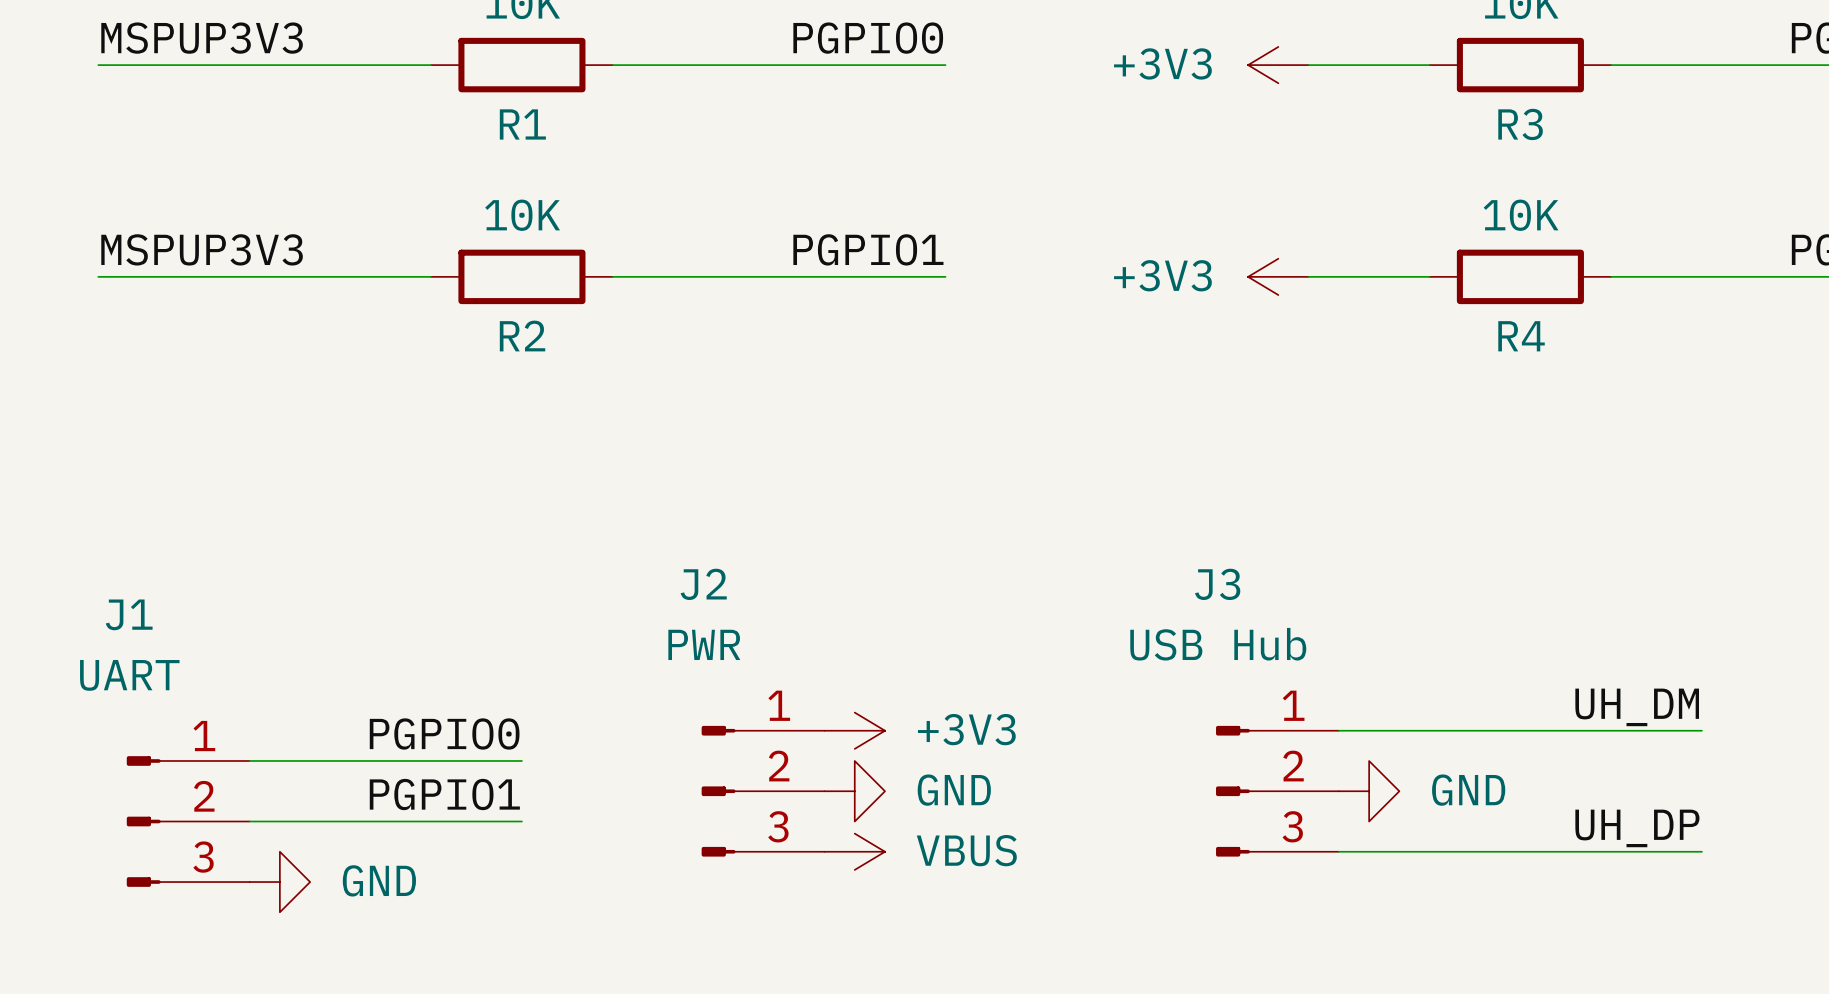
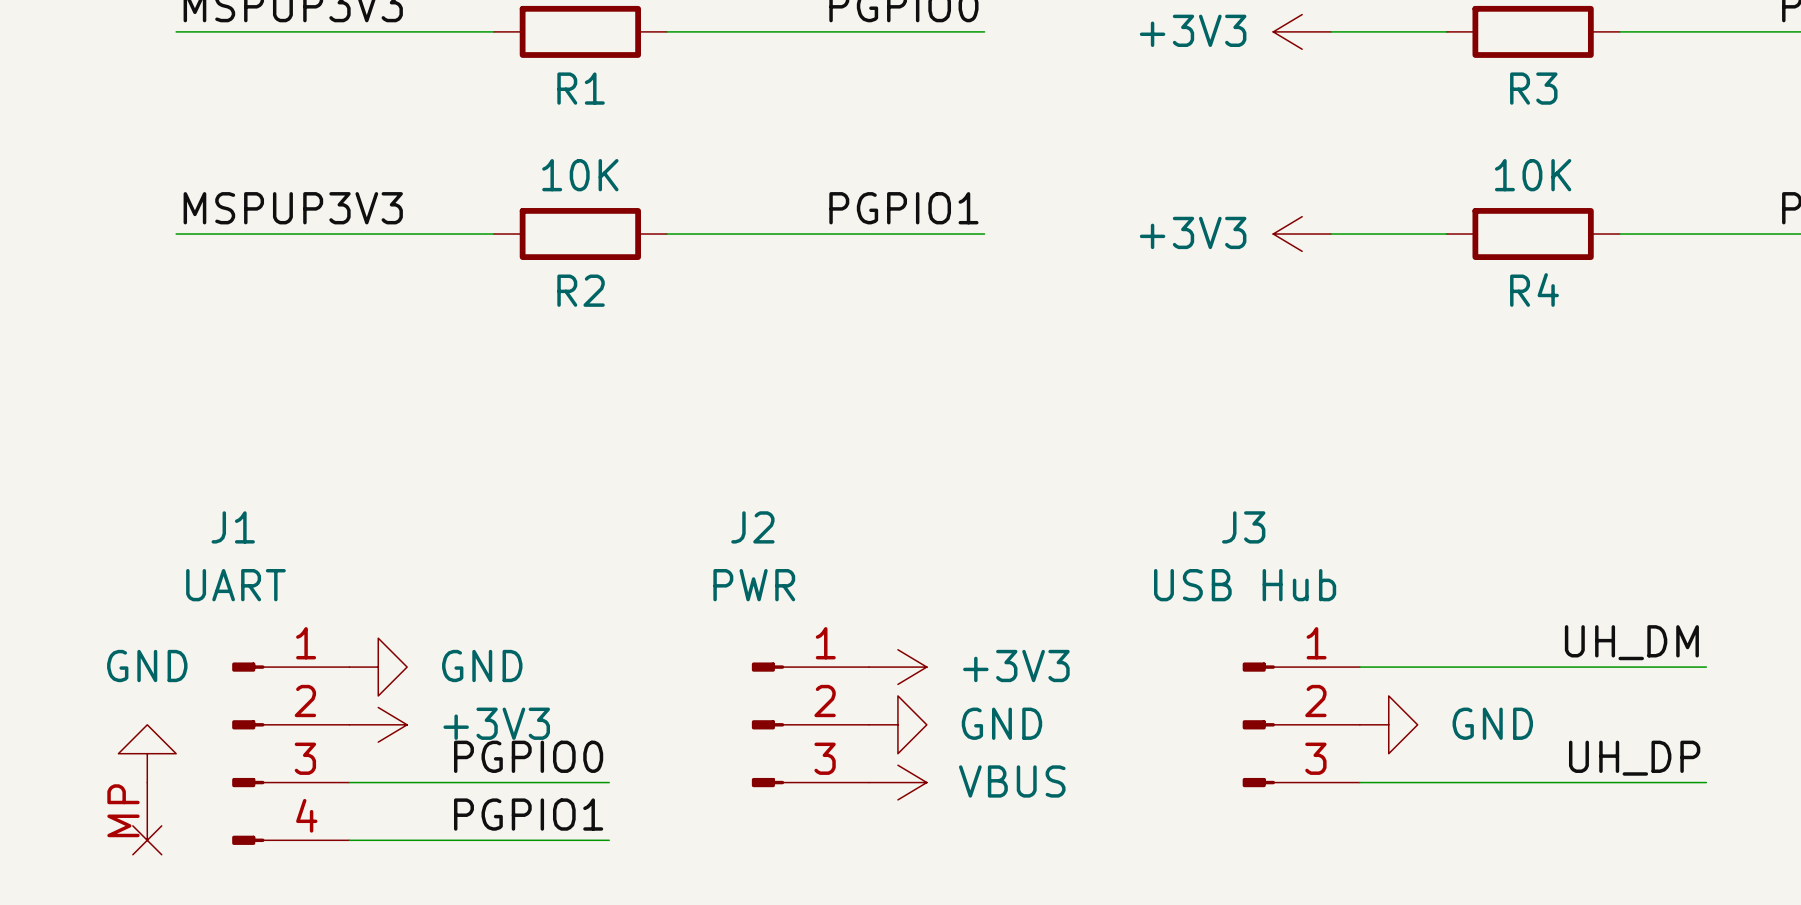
J1 name position: J1 (129, 614) -> J1 (233, 527)
J1 value position: UART (129, 675) -> UART (235, 585)
power symbol: none -> GND (378, 667)
label position: PGPIO0 (444, 733) -> PGPIO0 (528, 756)
J1 symbol: [126, 756, 250, 887] -> [132, 662, 350, 855]
wire: (249, 760) (521, 760) -> (349, 782) (609, 782)
power symbol: none -> +3V3 (378, 724)
label position: PGPIO1 (444, 794) -> PGPIO1 (528, 814)
power symbol: none -> GND (147, 753)
wire: (249, 821) (521, 821) -> (349, 840) (609, 840)
power symbol: GND (279, 882) -> none

